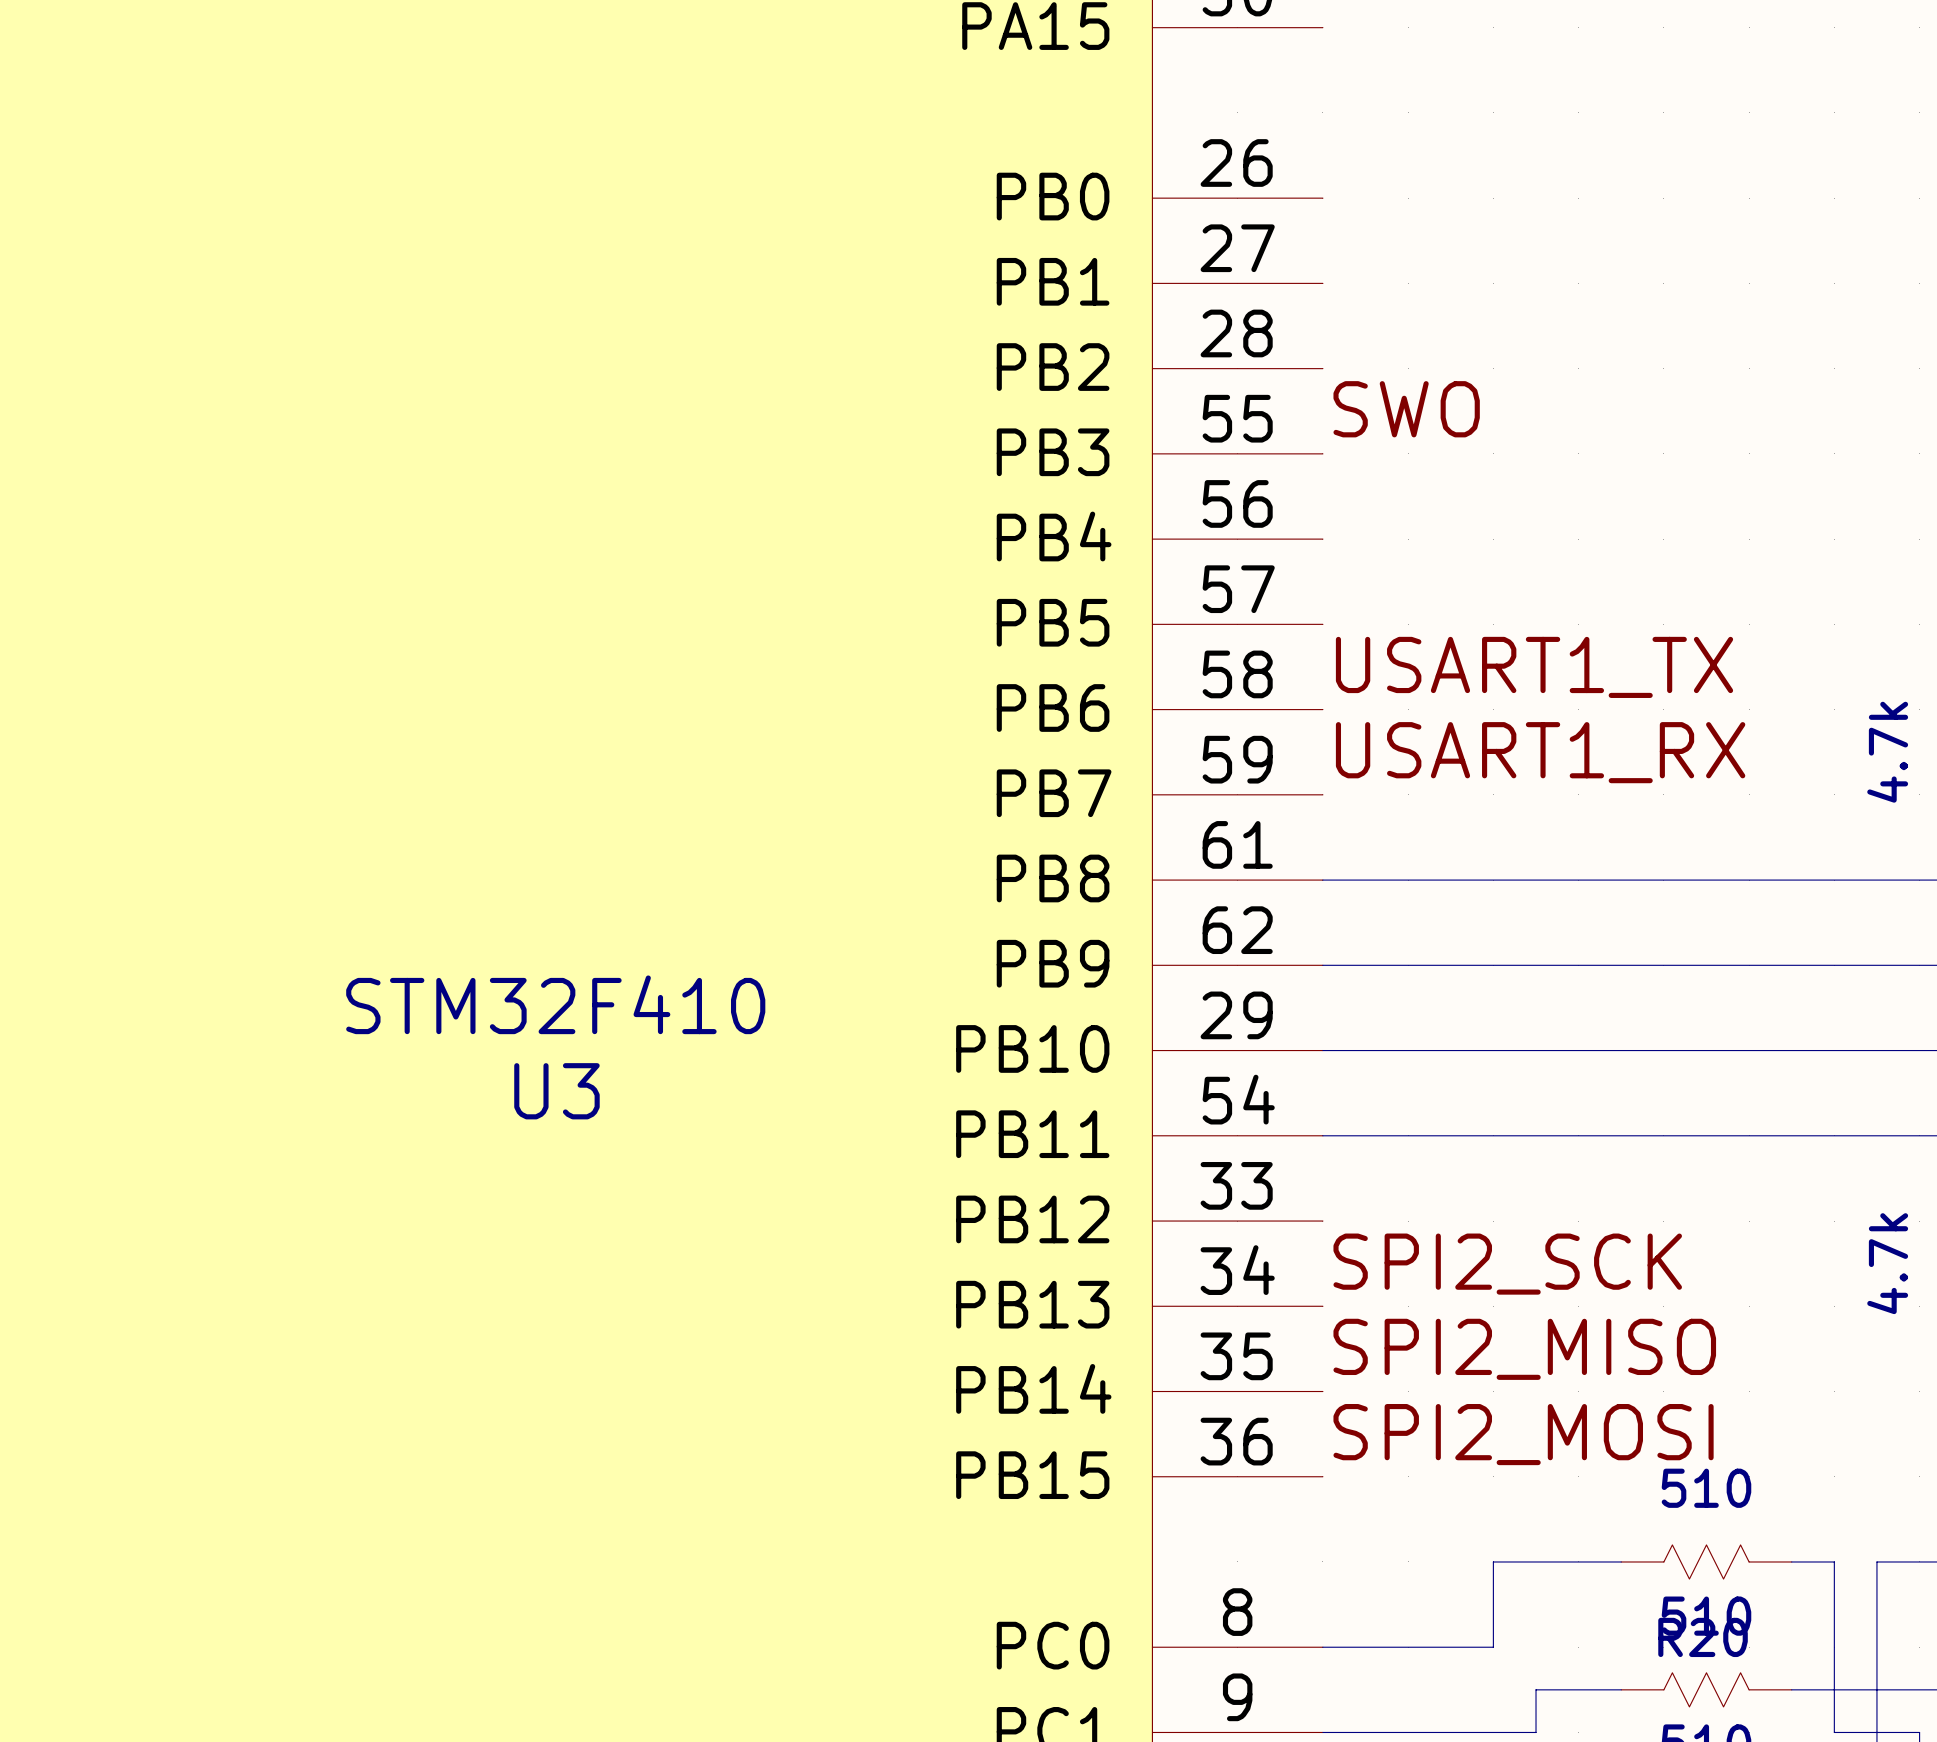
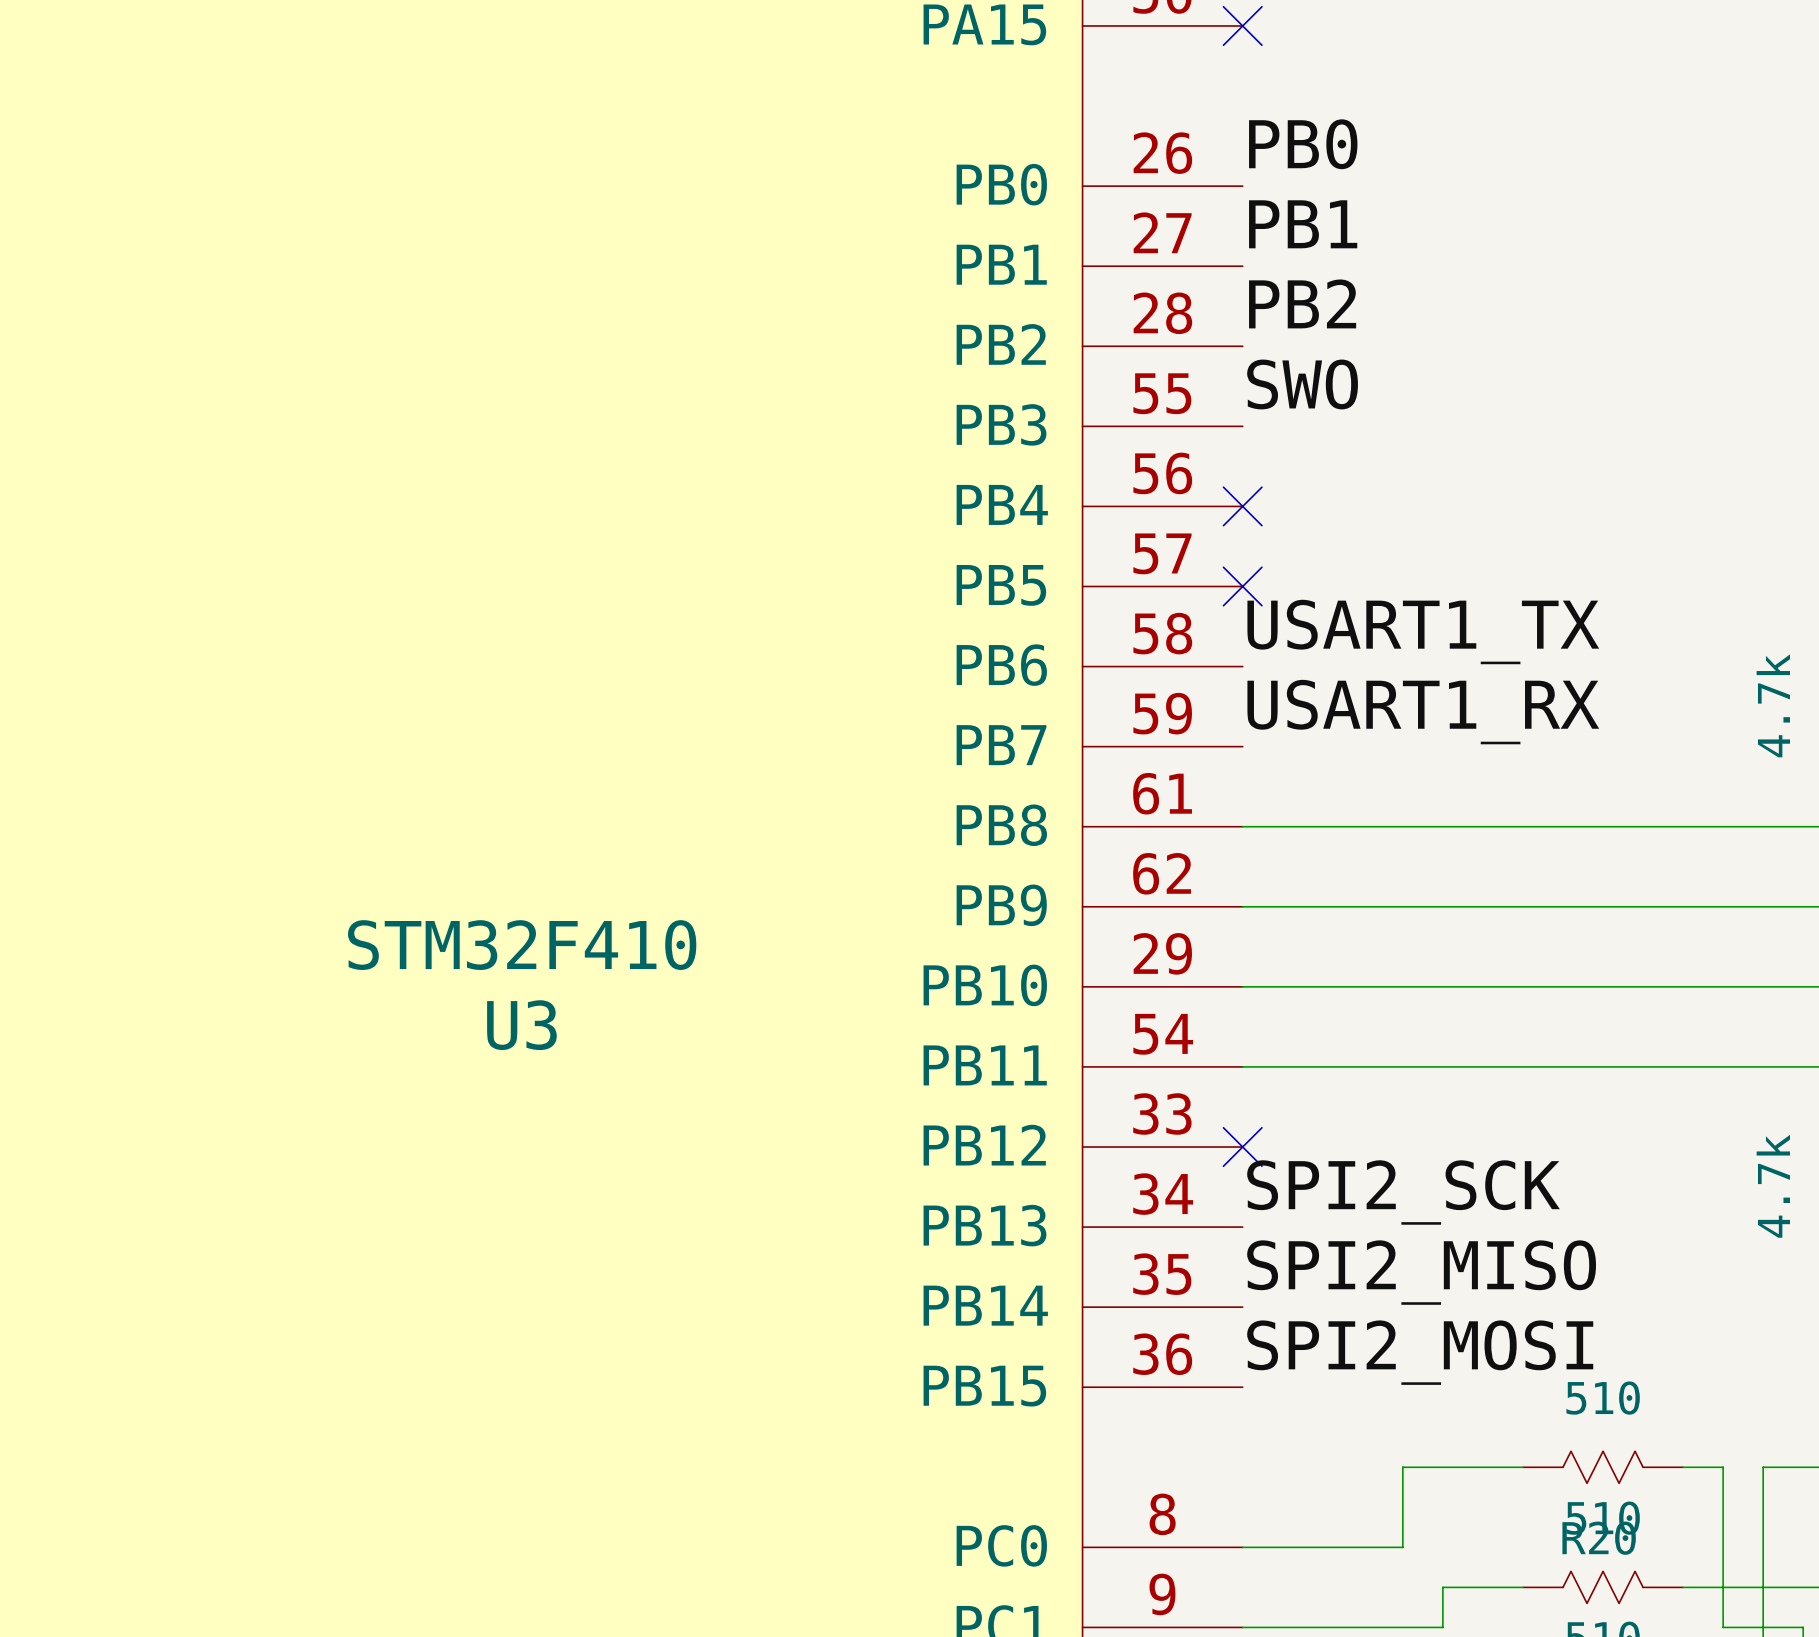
no-connect mark: none -> (1242, 25)
label: none -> PB0 (1303, 144)
label: none -> PB1 (1303, 224)
label: none -> PB2 (1302, 303)
no-connect mark: none -> (1242, 506)
no-connect mark: none -> (1242, 586)
no-connect mark: none -> (1242, 1147)

